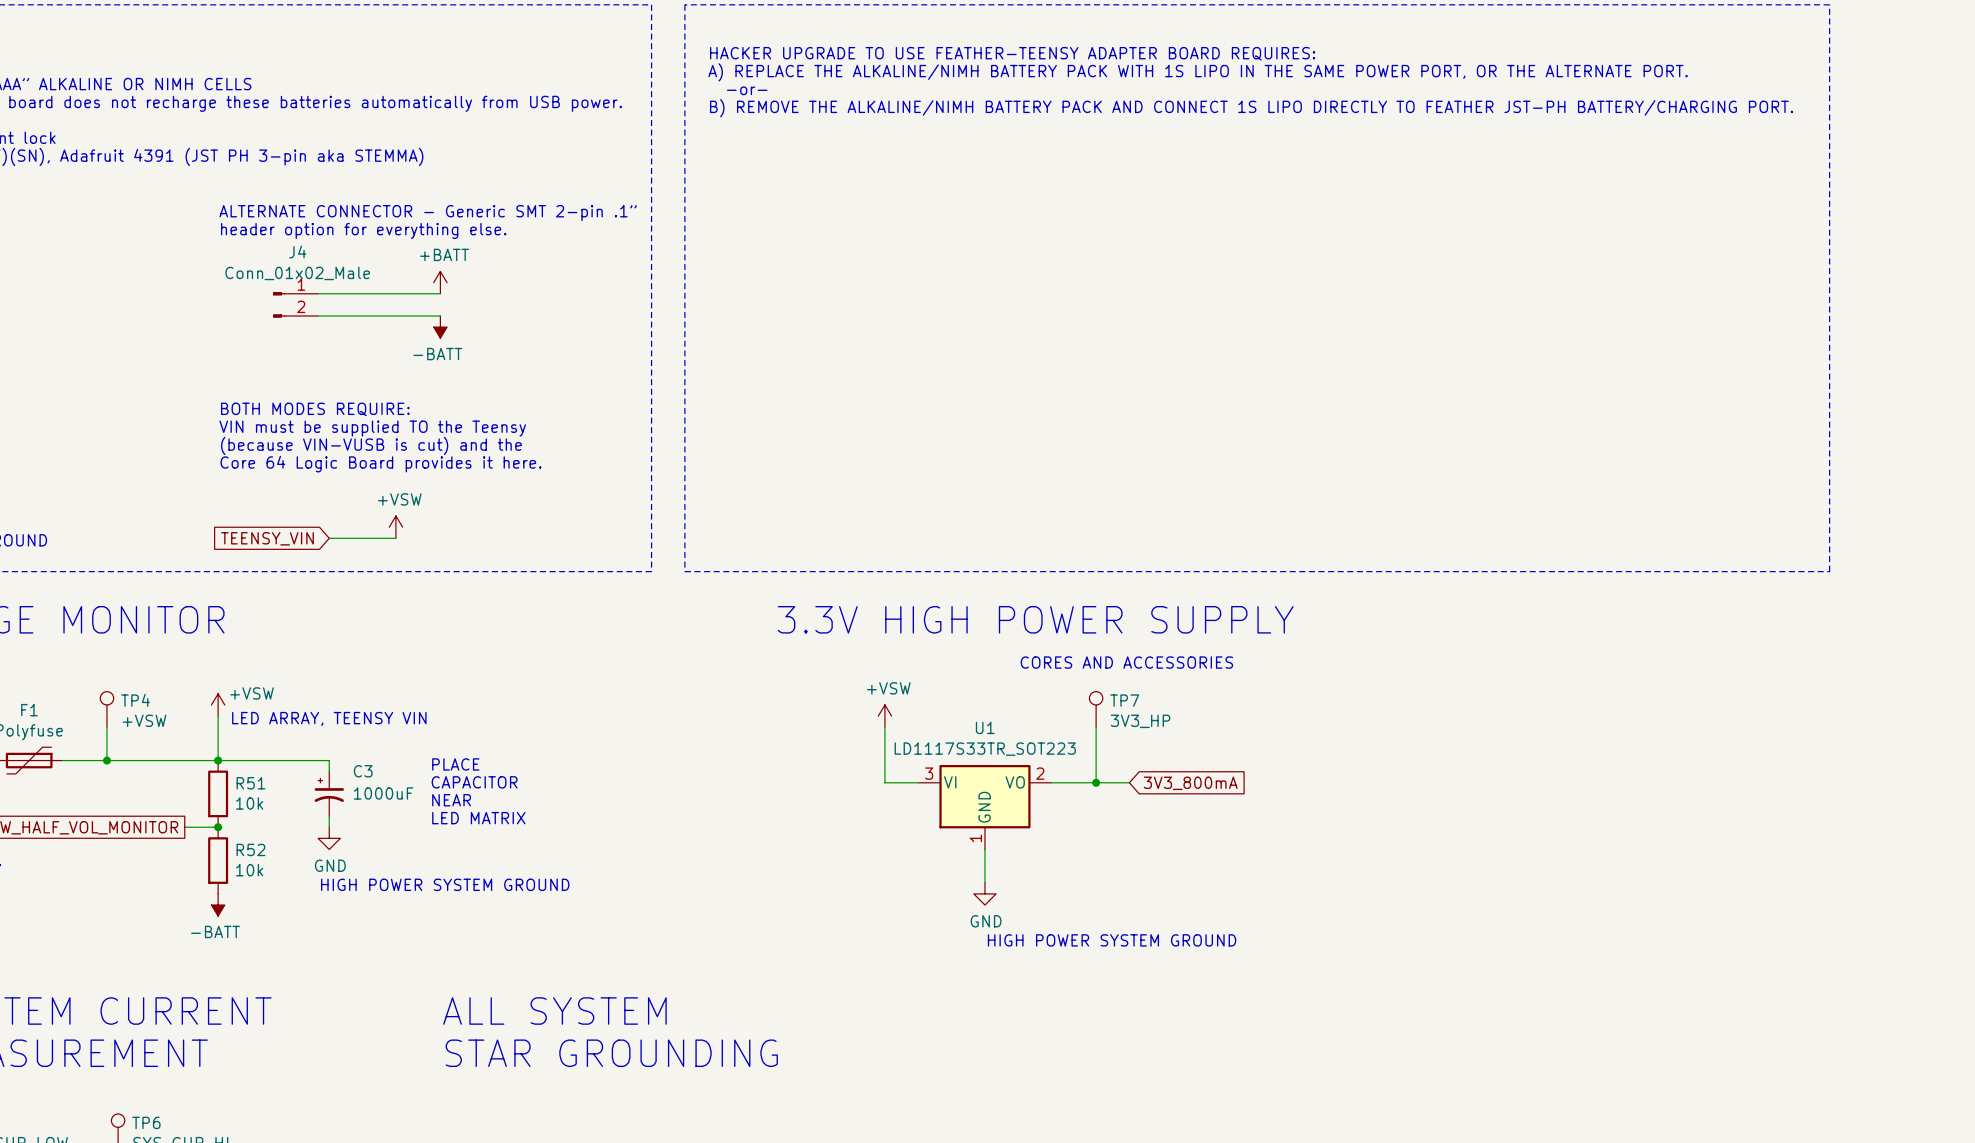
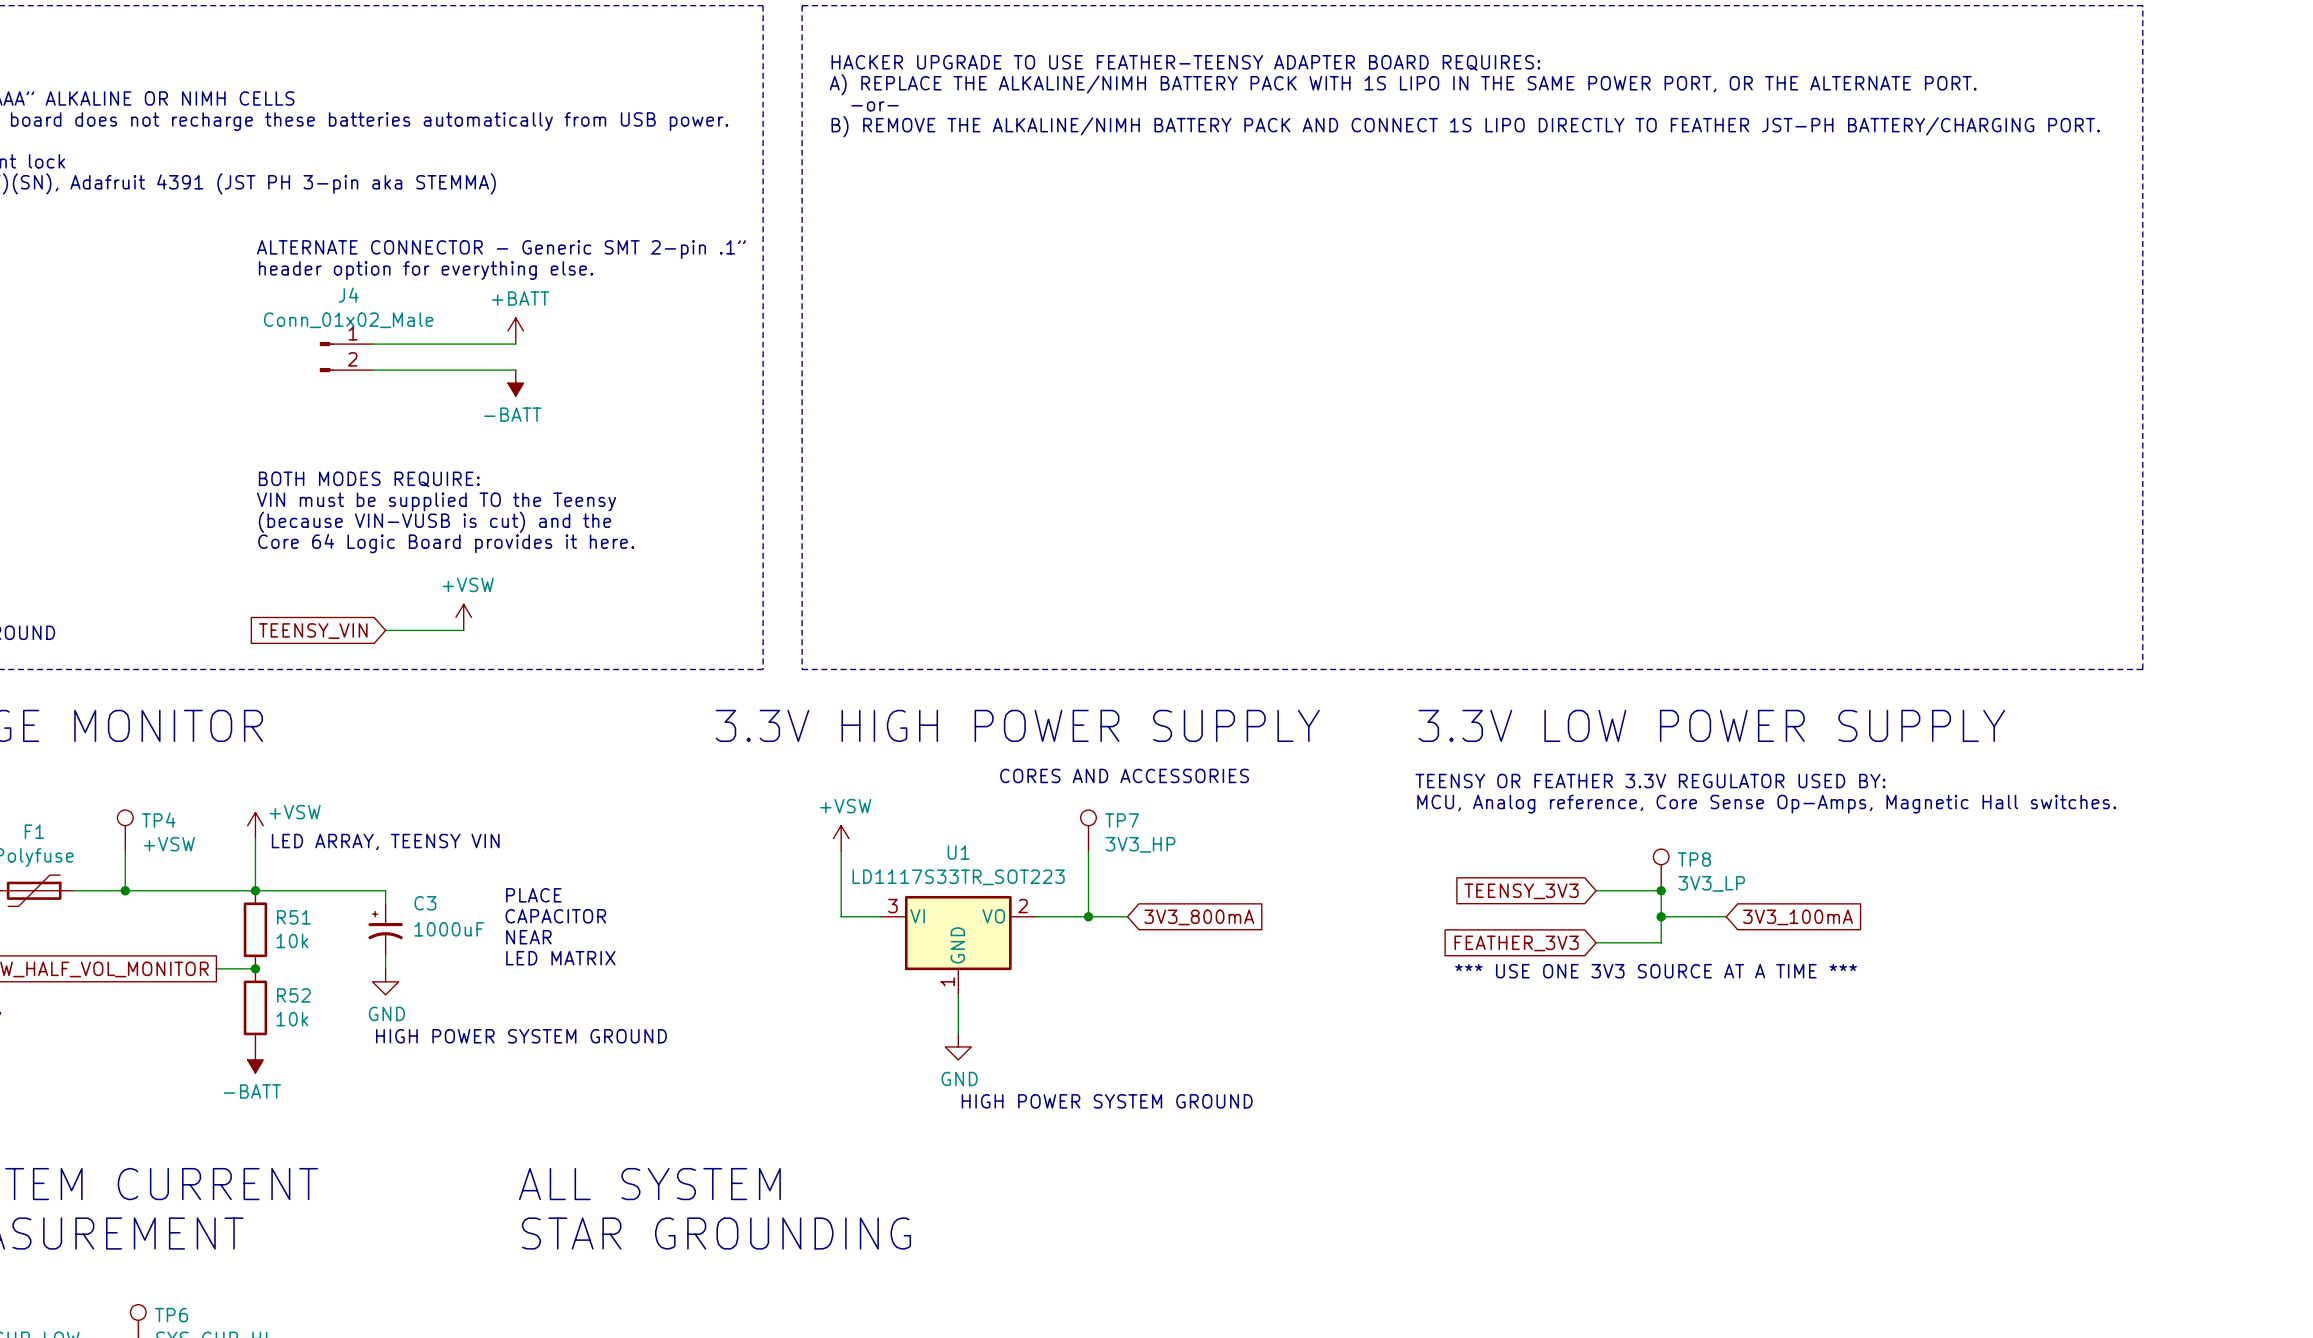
text position: 3.3V HIGH POWER SUPPLY (1035, 619) -> 3.3V HIGH POWER SUPPLY (1017, 725)
text: none -> 3.3V LOW POWER SUPPLY (1711, 725)
text position: CORES AND ACCESSORIES (1126, 662) -> CORES AND ACCESSORIES (1124, 775)
text: none -> TEENSY OR FEATHER 3.3V REGULATOR USED BY: (1650, 781)
text: none -> MCU, Analog reference, Core Sense Op-Amps, Magnetic Hall switches. (1766, 804)
TP7 position: (1096, 709) -> (1088, 830)
power symbol position: +VSW (884, 716) -> +VSW (841, 838)
wire: none -> (841, 851) (841, 916) (880, 916)
wire: (884, 727) (884, 782) -> none
wire: (1096, 727) (1096, 782) -> (1088, 851) (1088, 916)
TP8: none -> 3V3_LP (1661, 869)
wire: none -> (1596, 890) (1661, 890) (1661, 942) (1596, 942)
junction: none -> (1661, 890)
global label: none -> TEENSY_3V3 (1521, 891)
junction: none -> (1088, 916)
wire: (1051, 782) (1129, 782) -> none
junction: (1096, 782) -> none
wire: none -> (1661, 916) (1726, 916)
junction: none -> (1661, 916)
global label position: 3V3_800mA (1190, 783) -> 3V3_800mA (1199, 917)
global label: none -> 3V3_100mA (1798, 917)
global label: none -> FEATHER_3V3 (1516, 943)
U1 position: (984, 807) -> (958, 945)
text: none -> *** USE ONE 3V3 SOURCE AT A TIME *** (1656, 971)
wire: (984, 849) (984, 882) -> (958, 994) (958, 1033)
power symbol position: GND (984, 893) -> GND (958, 1046)
text position: HIGH POWER SYSTEM GROUND (1112, 940) -> HIGH POWER SYSTEM GROUND (1107, 1101)

